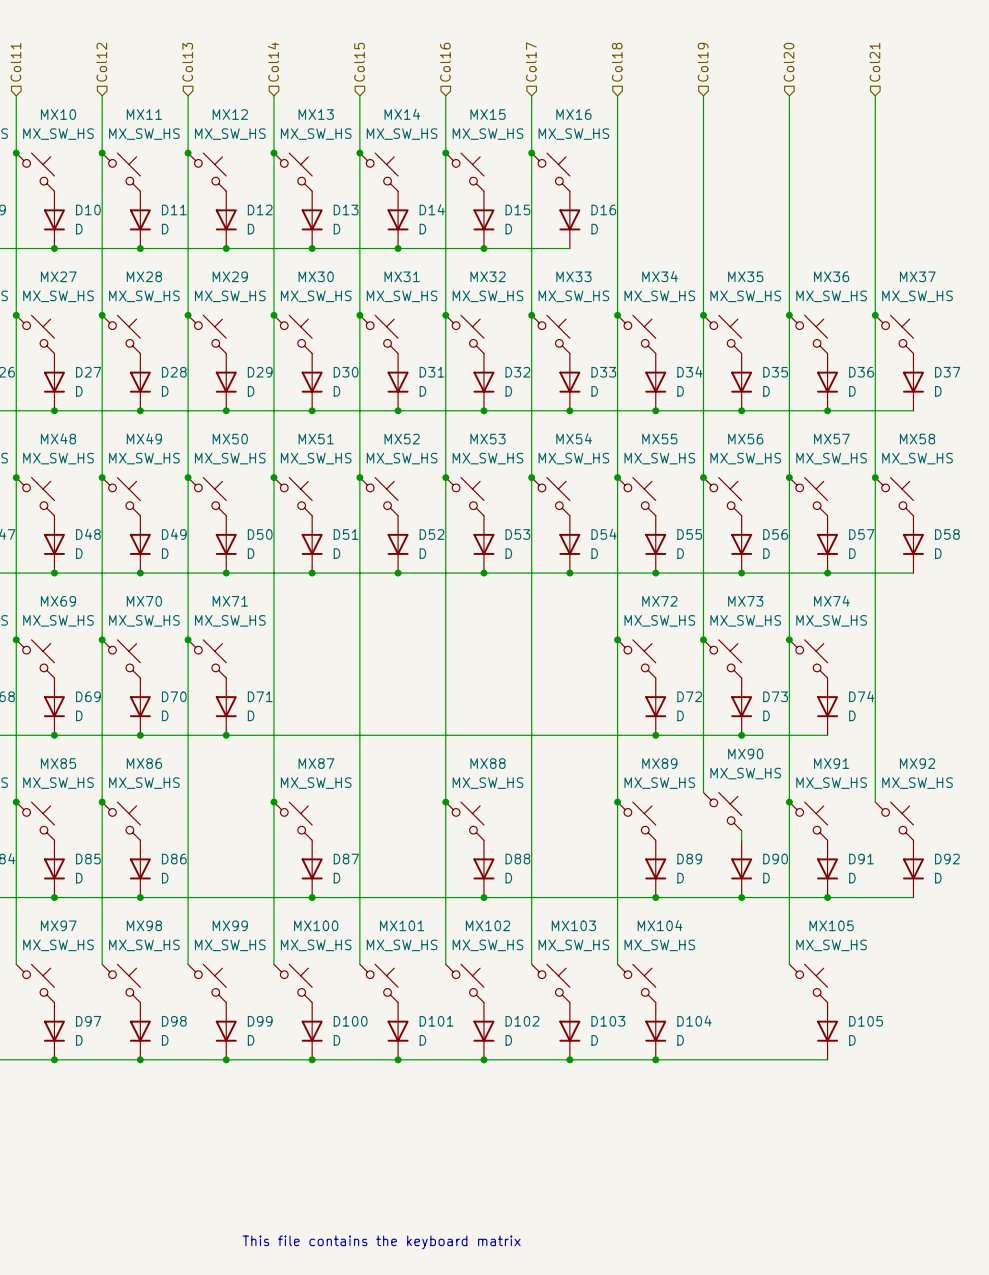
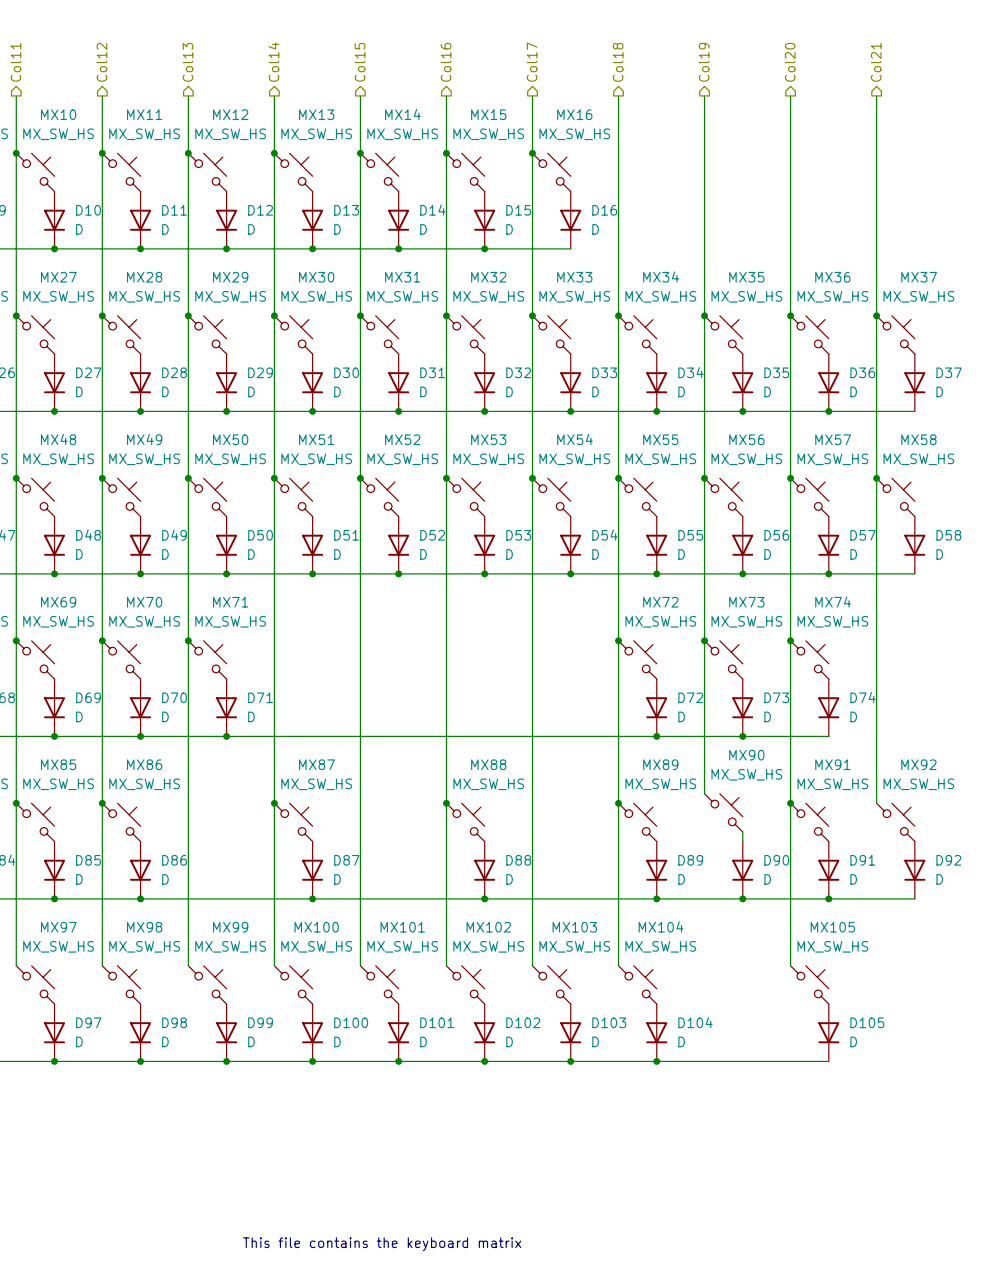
hierarchical label shape: input (15, 62) -> output (15, 62)
hierarchical label shape: input (101, 62) -> output (101, 62)
hierarchical label shape: input (187, 62) -> output (188, 62)
hierarchical label shape: input (273, 62) -> output (273, 62)
hierarchical label shape: input (359, 62) -> output (360, 62)
hierarchical label shape: input (445, 62) -> output (446, 62)
hierarchical label shape: input (531, 62) -> output (532, 62)
hierarchical label shape: input (617, 62) -> output (618, 62)
hierarchical label shape: input (703, 62) -> output (704, 62)
hierarchical label shape: input (789, 62) -> output (790, 62)
hierarchical label shape: input (874, 62) -> output (876, 62)

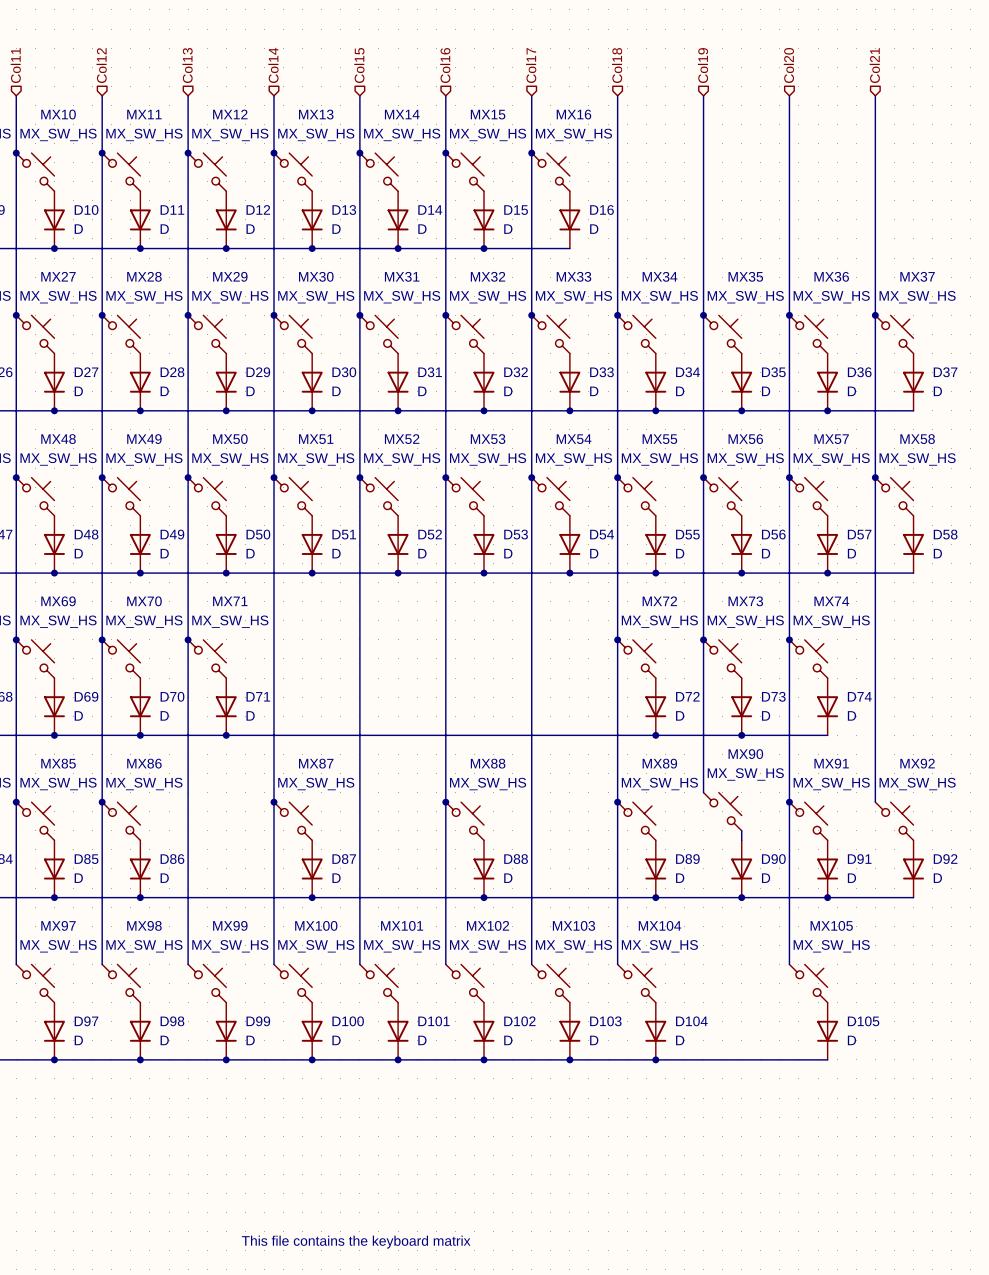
hierarchical label shape: output (15, 62) -> input (15, 65)
hierarchical label shape: output (101, 62) -> input (101, 65)
hierarchical label shape: output (188, 62) -> input (187, 65)
hierarchical label shape: output (273, 62) -> input (273, 65)
hierarchical label shape: output (360, 62) -> input (359, 65)
hierarchical label shape: output (446, 62) -> input (445, 65)
hierarchical label shape: output (532, 62) -> input (531, 65)
hierarchical label shape: output (618, 62) -> input (617, 65)
hierarchical label shape: output (704, 62) -> input (702, 65)
hierarchical label shape: output (790, 62) -> input (788, 65)
hierarchical label shape: output (876, 62) -> input (874, 65)

